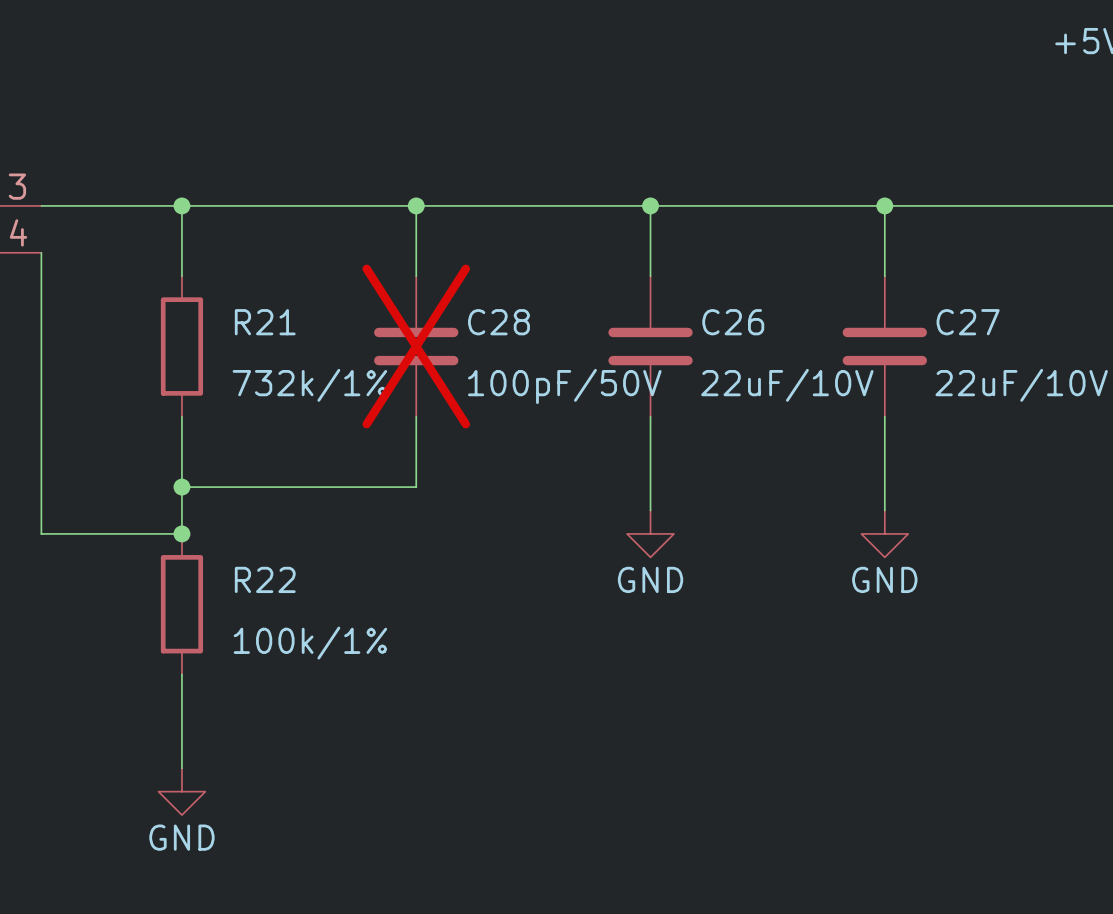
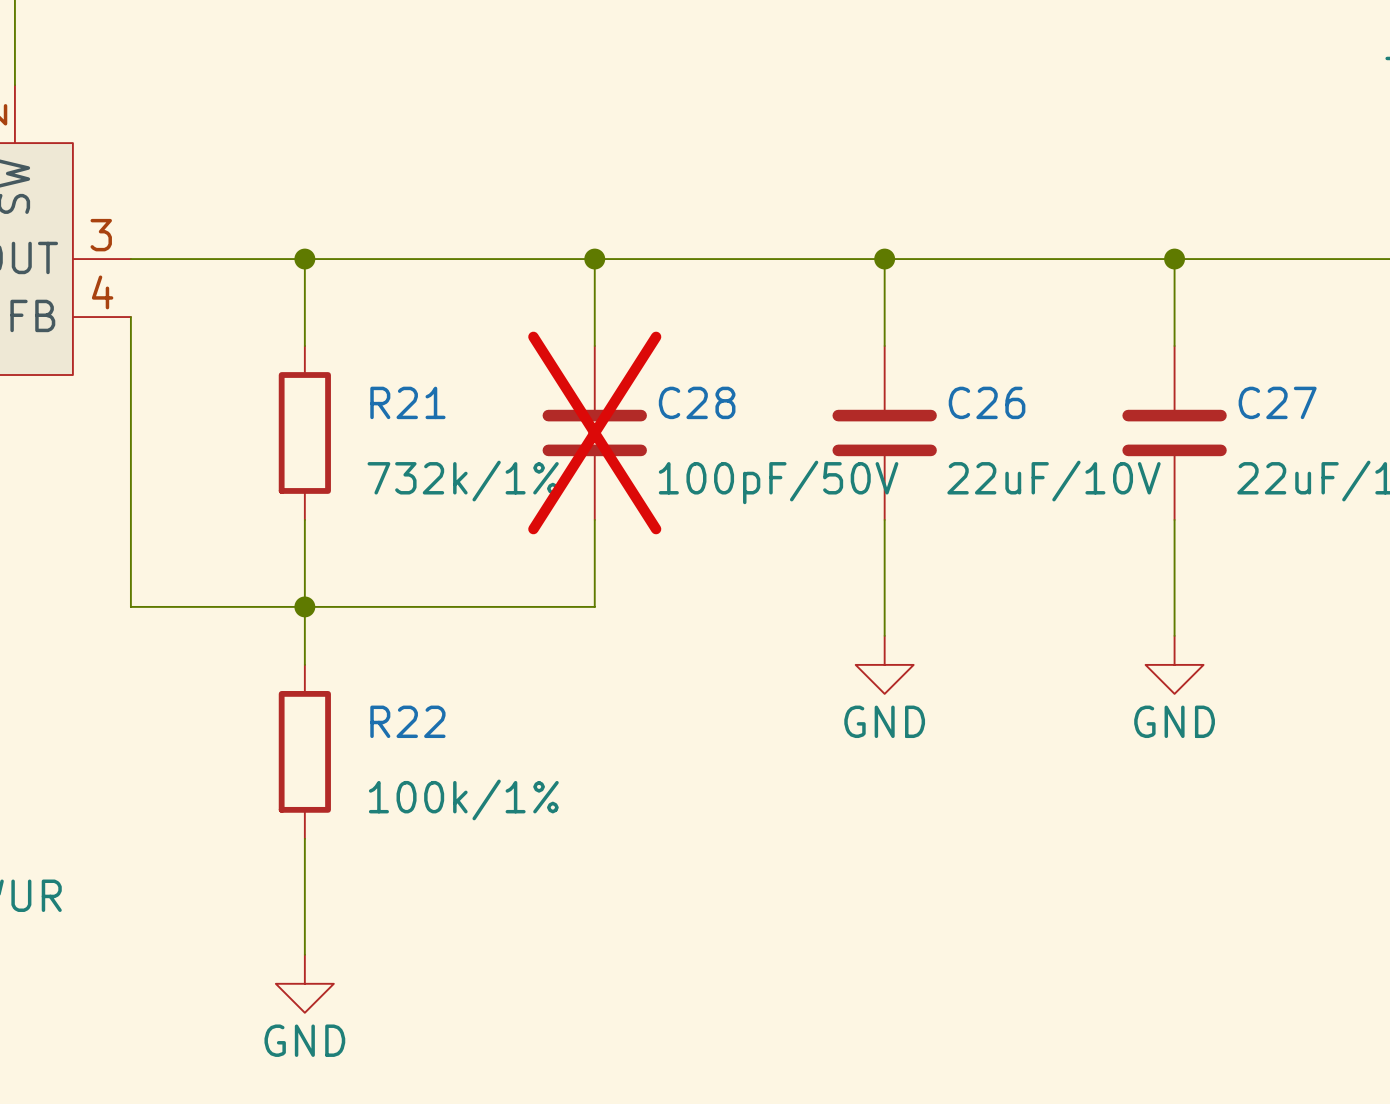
wire: (41, 487) (41, 533) (181, 533) -> (130, 606) (304, 606)
junction: (181, 533) -> none

